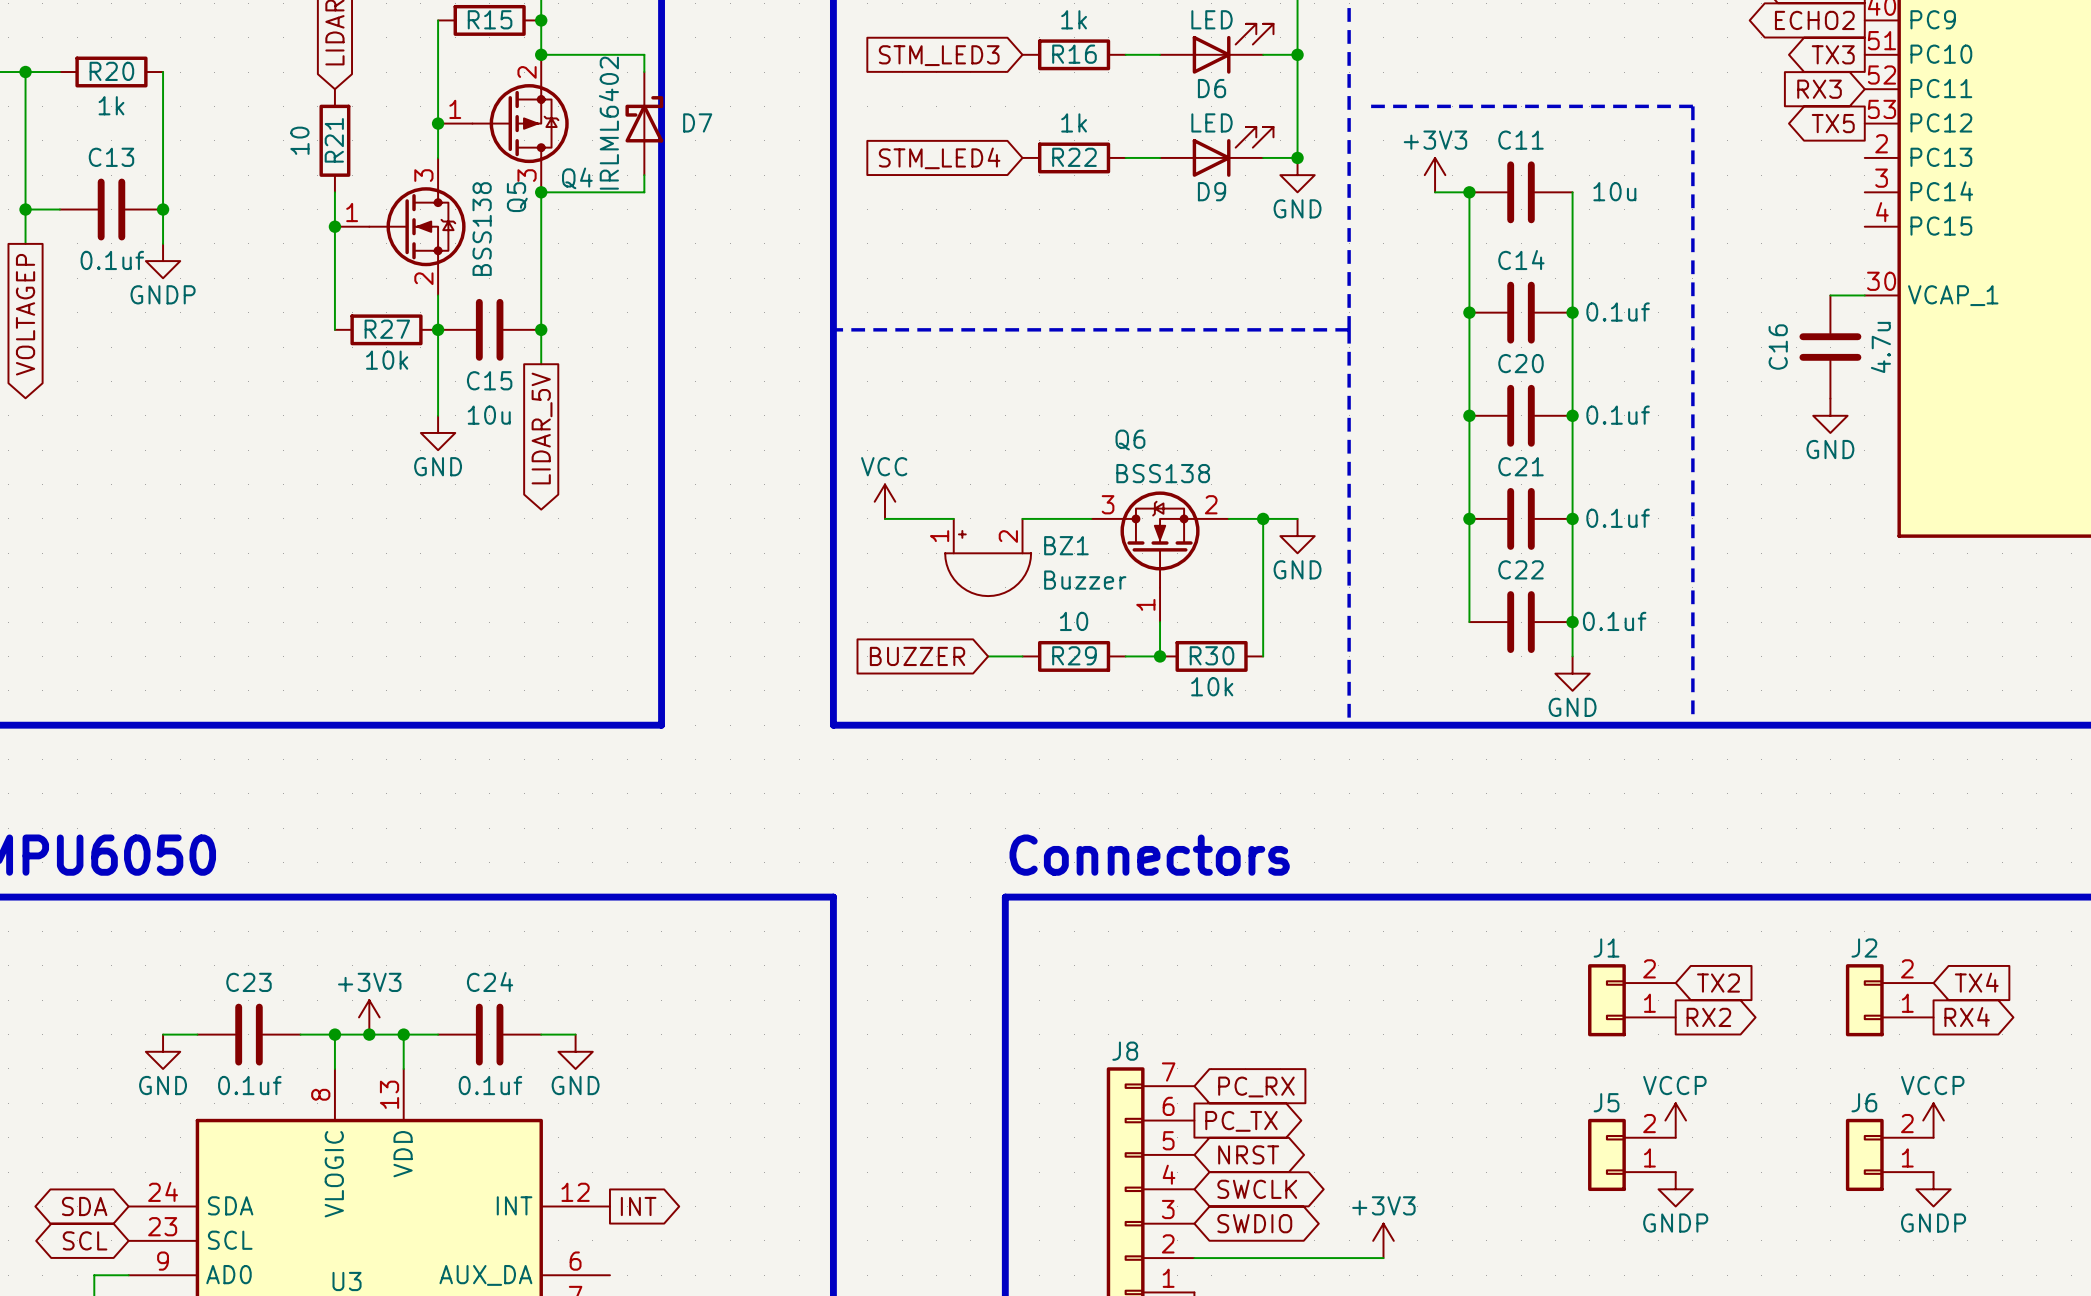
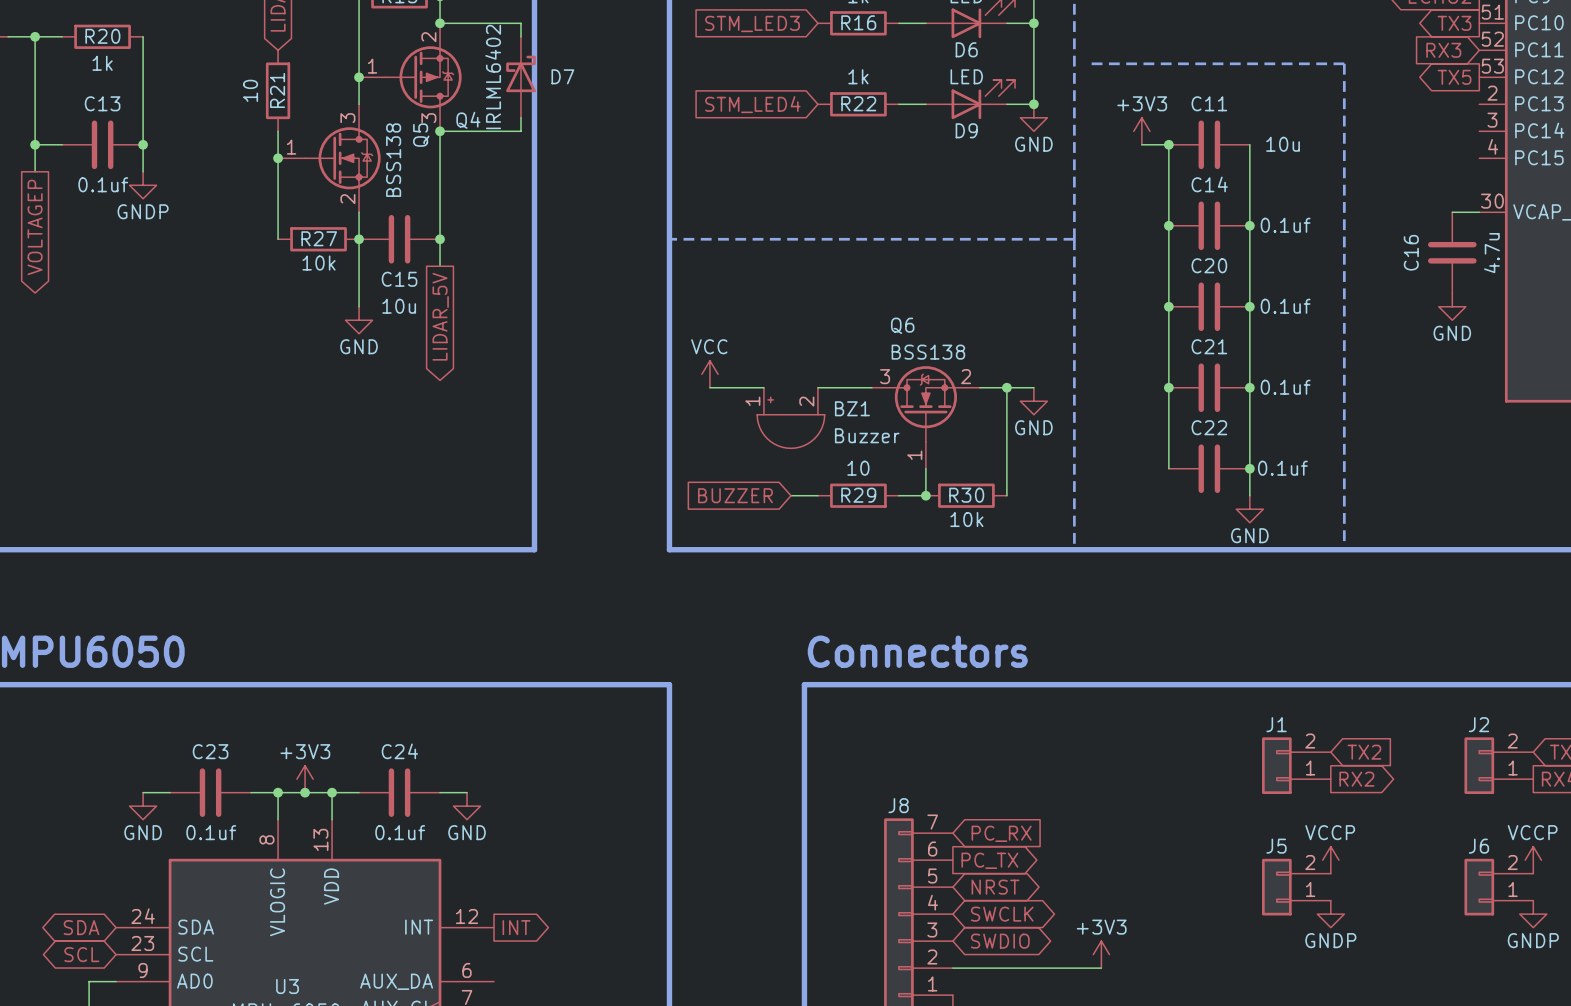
power symbol position: +3V3 (1435, 175) -> +3V3 (1141, 131)
wire: (1435, 192) (1469, 192) (1469, 209) -> (1141, 144) (1168, 144)
junction position: (1469, 192) -> (1168, 144)
C11 position: (1521, 192) -> (1209, 144)
wire: (1572, 192) (1572, 209) -> none

